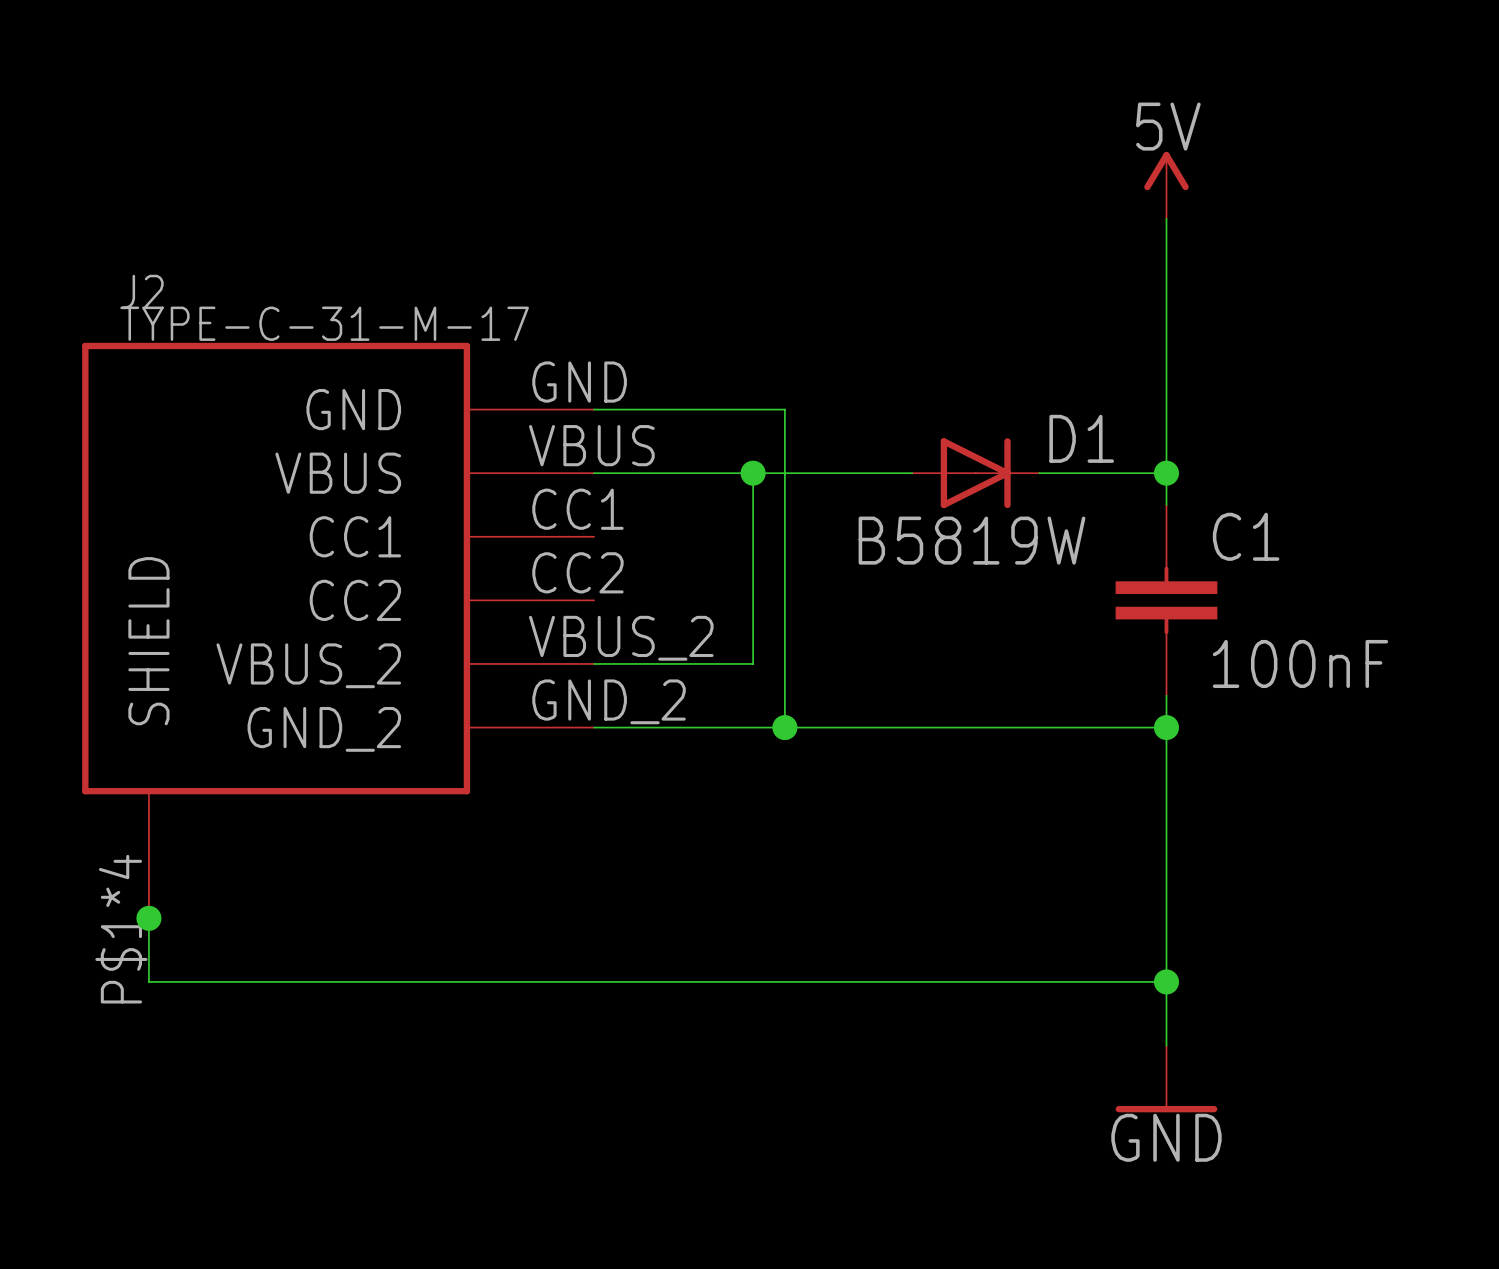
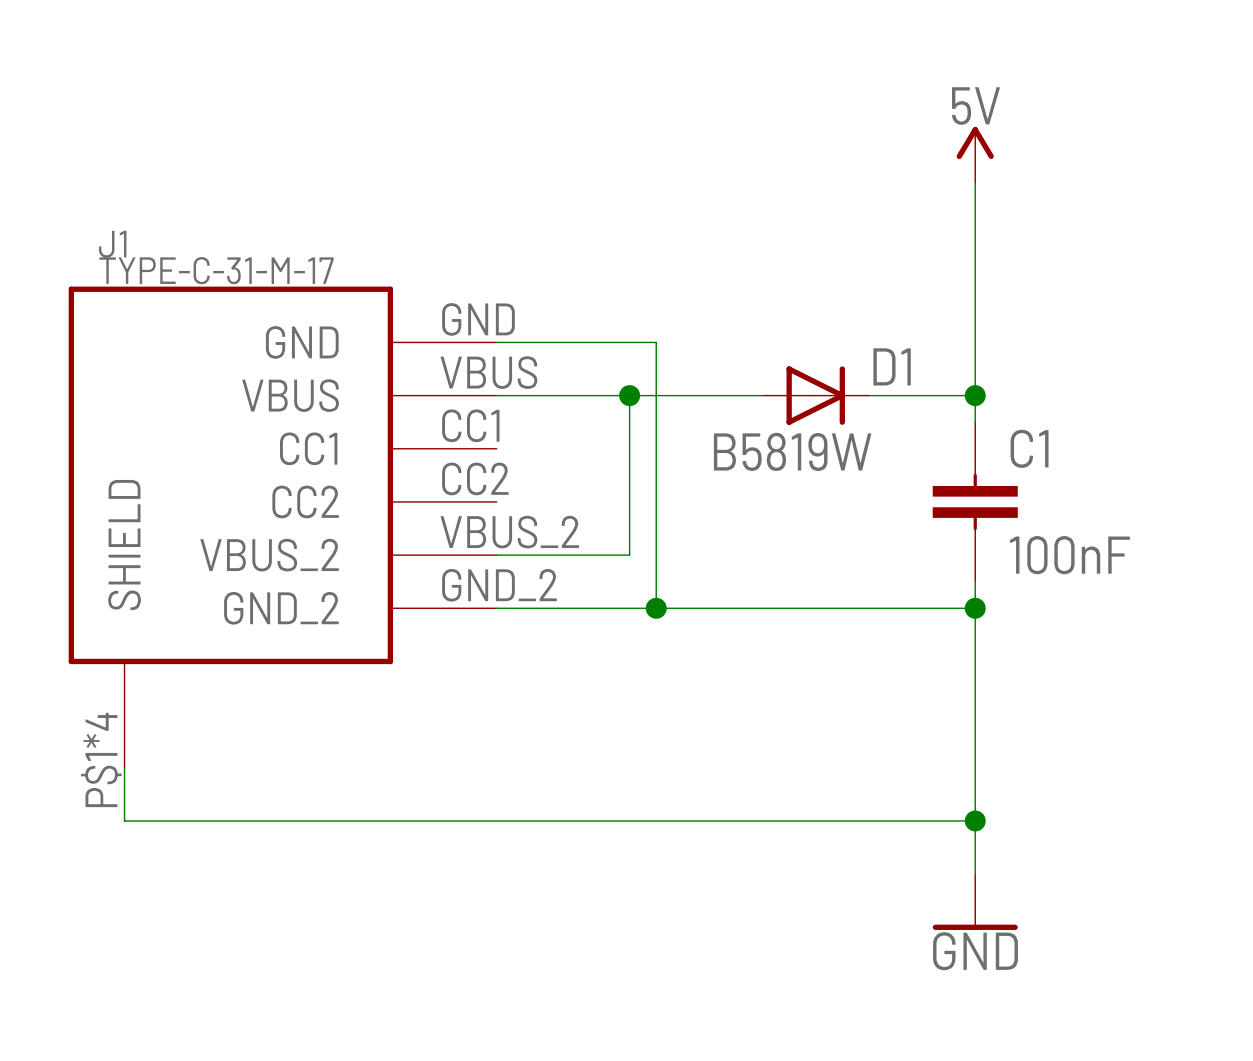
J2 name: J2 (142, 291) -> J1 (112, 244)
junction: (148, 918) -> none

